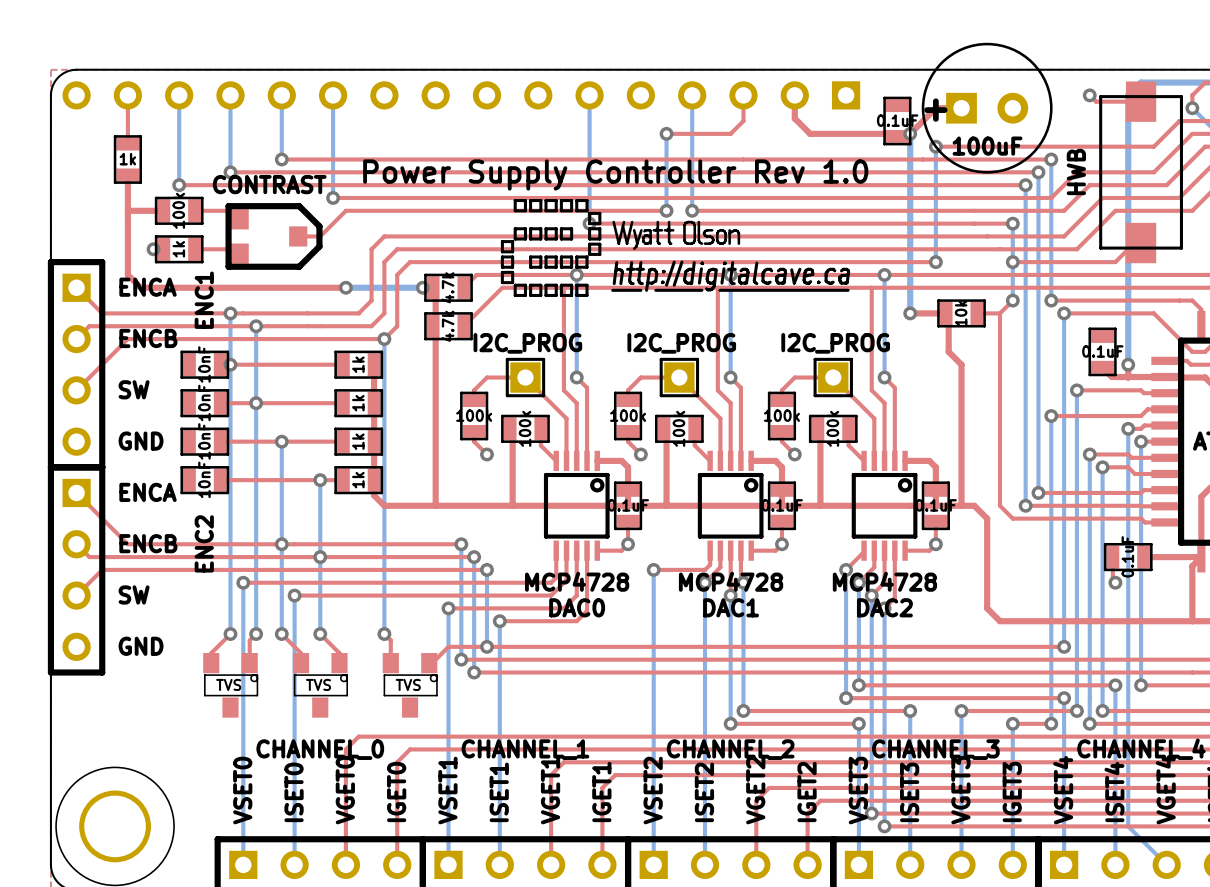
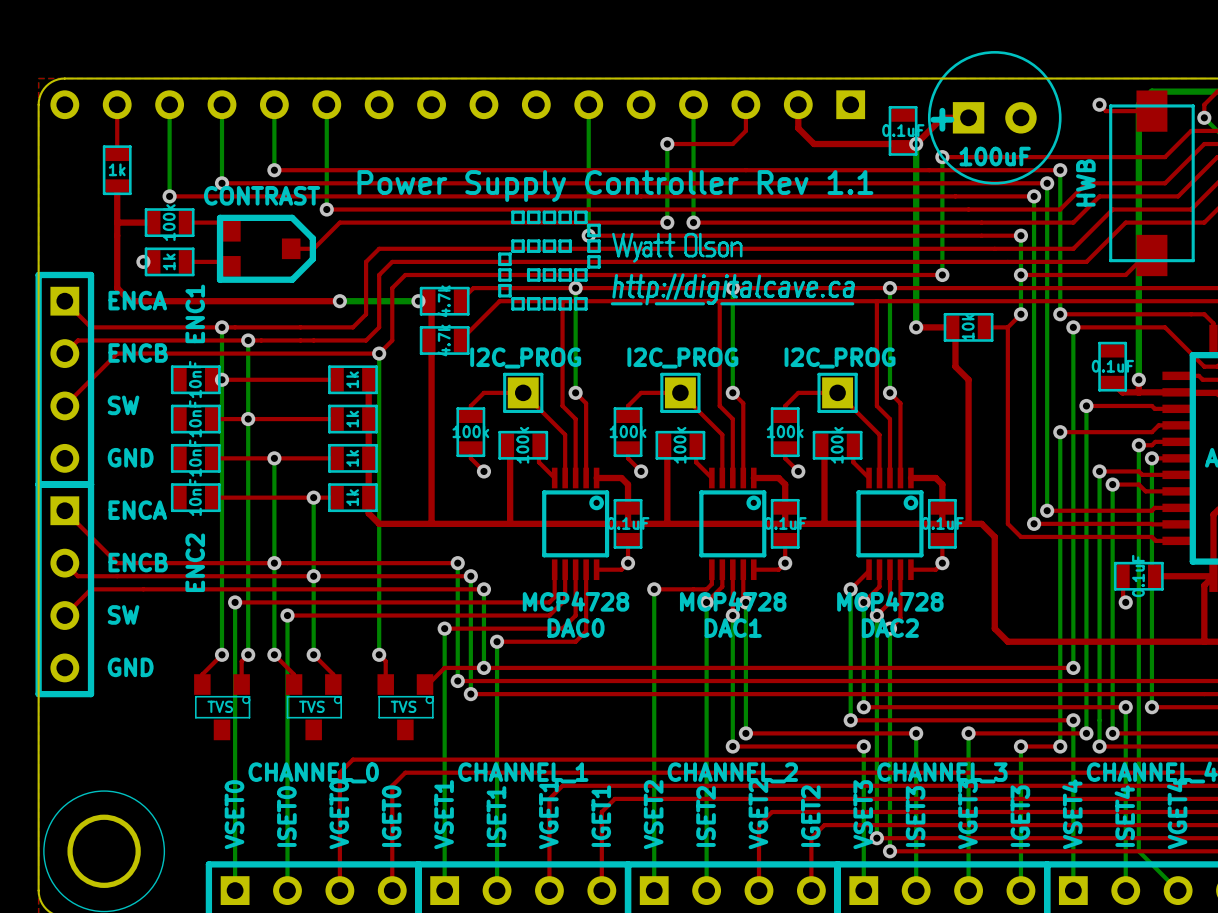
text: Power Supply Controller Rev 1.0 (615, 174) -> Power Supply Controller Rev 1.1 (615, 186)

